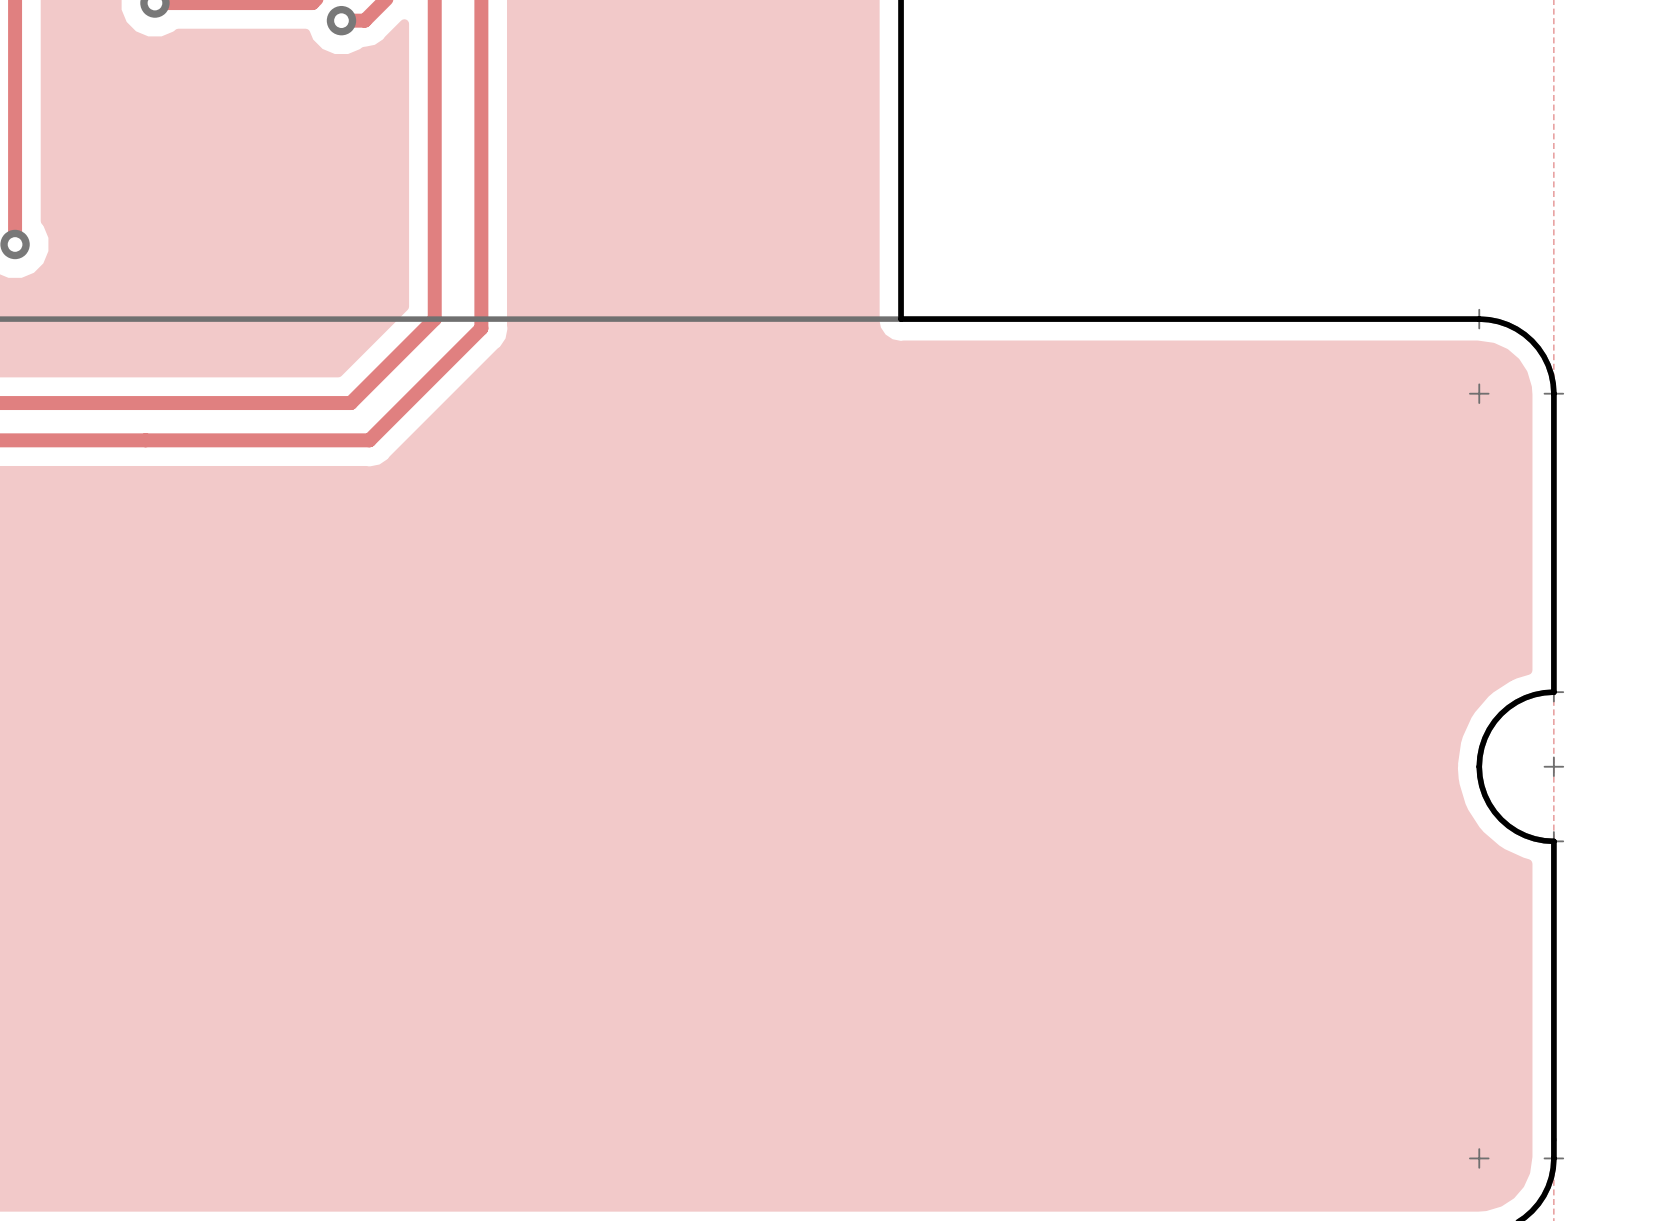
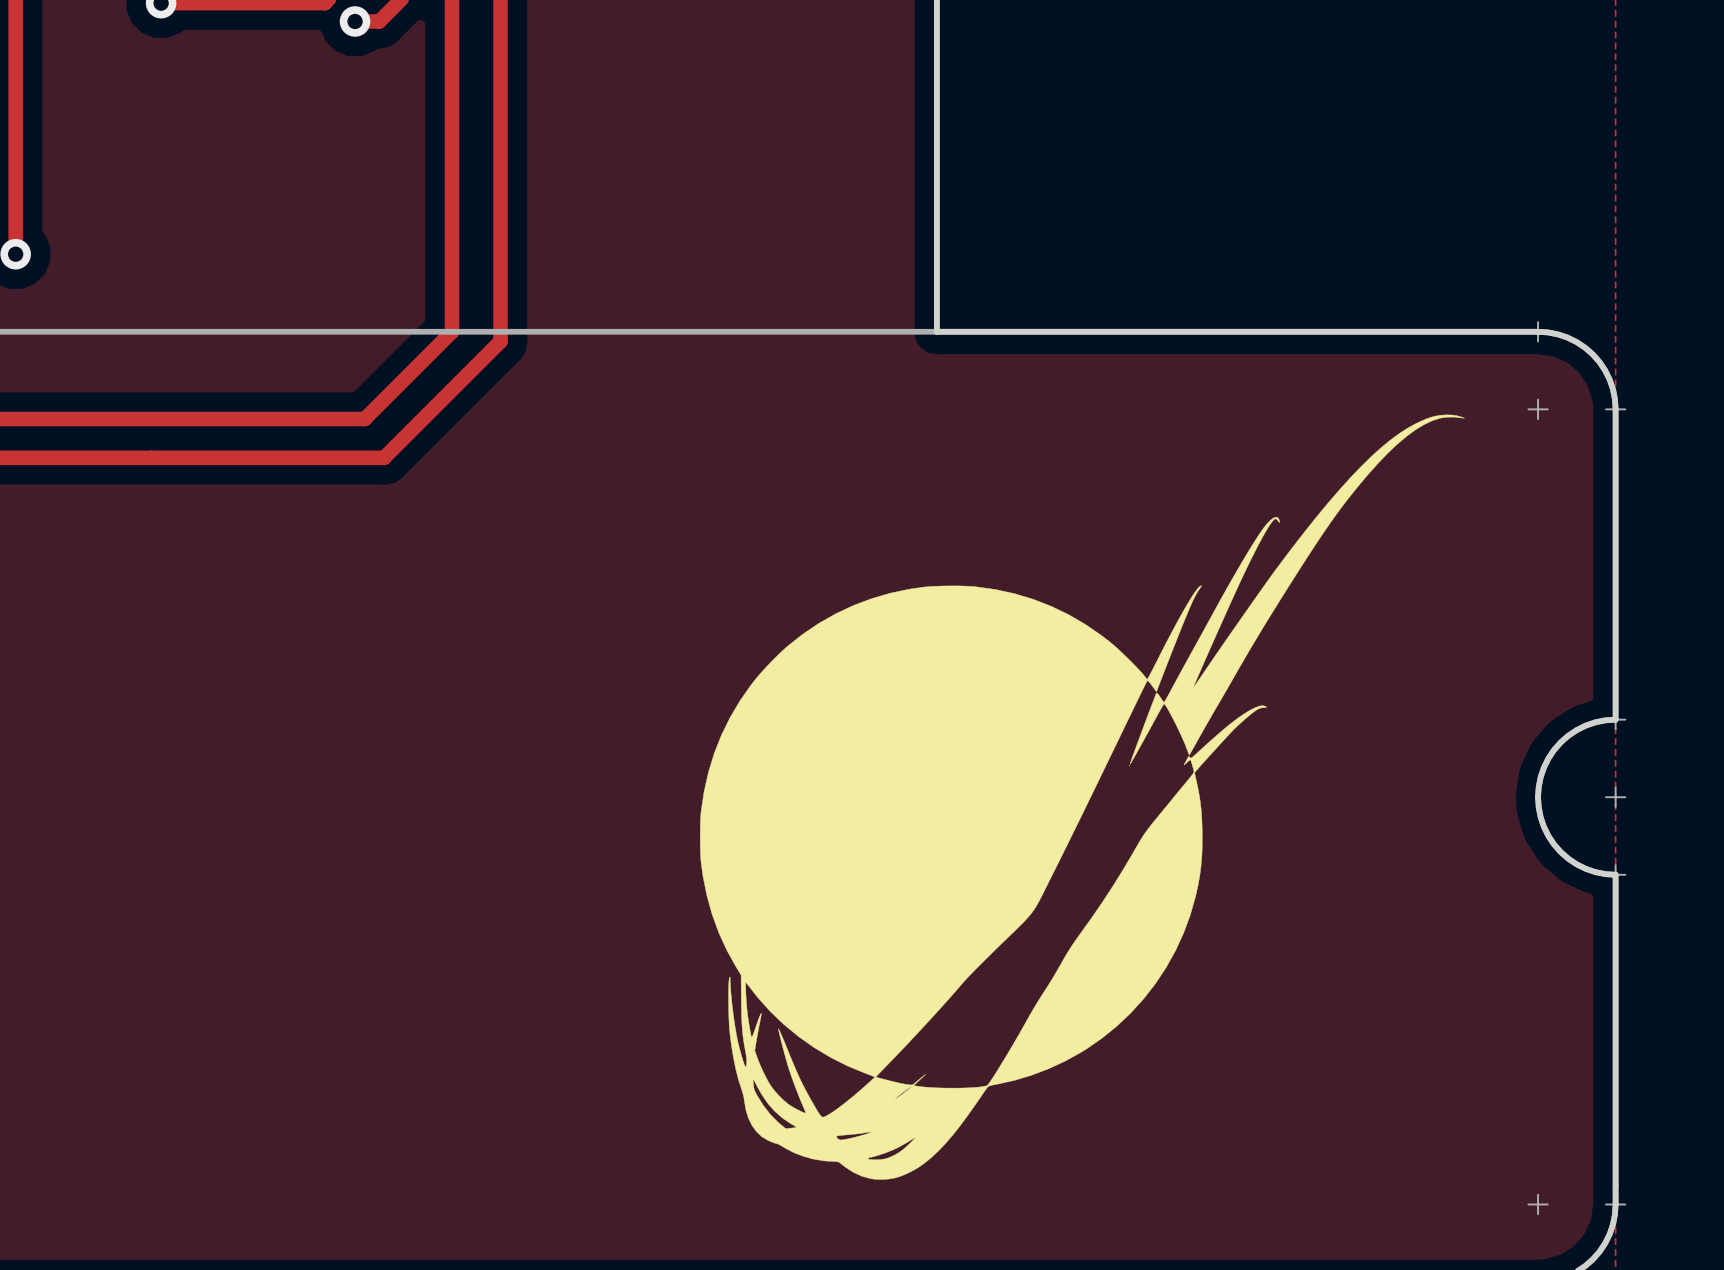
drawing: none -> [700, 414, 1465, 1180]

